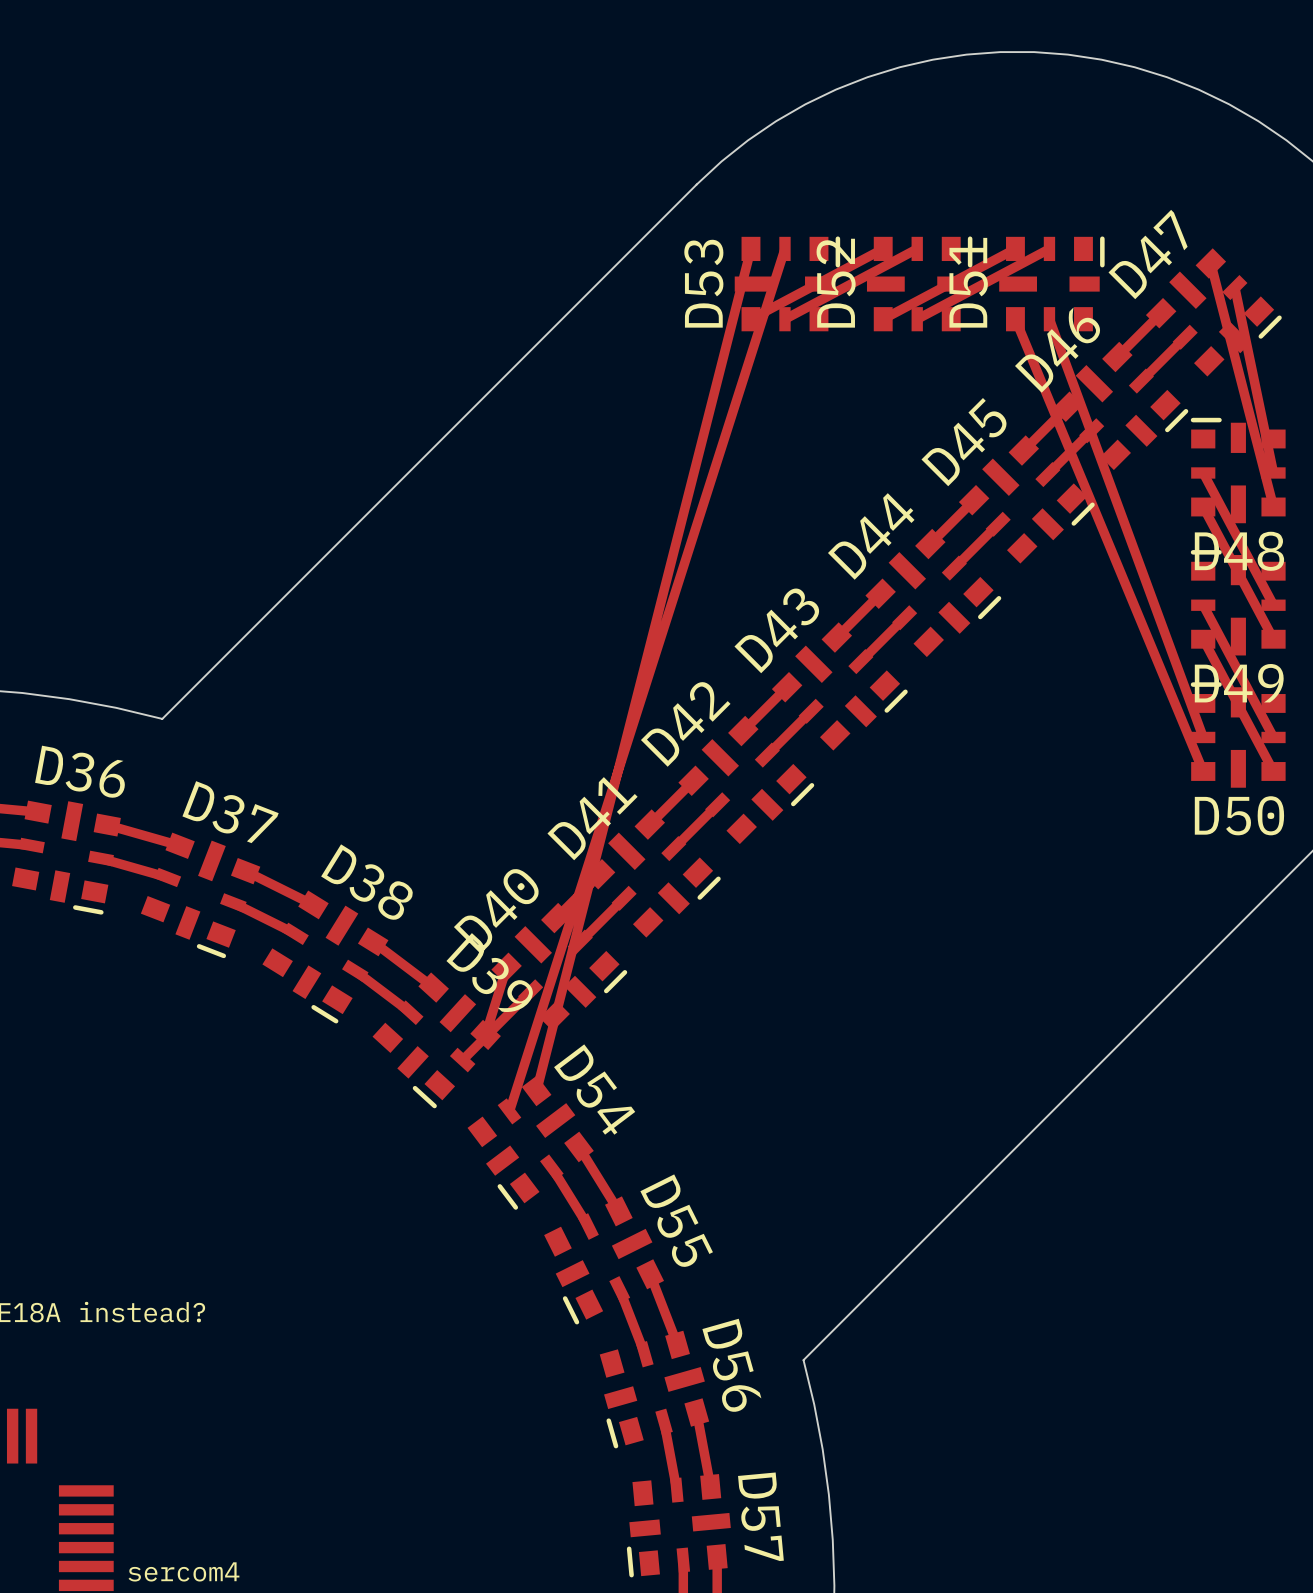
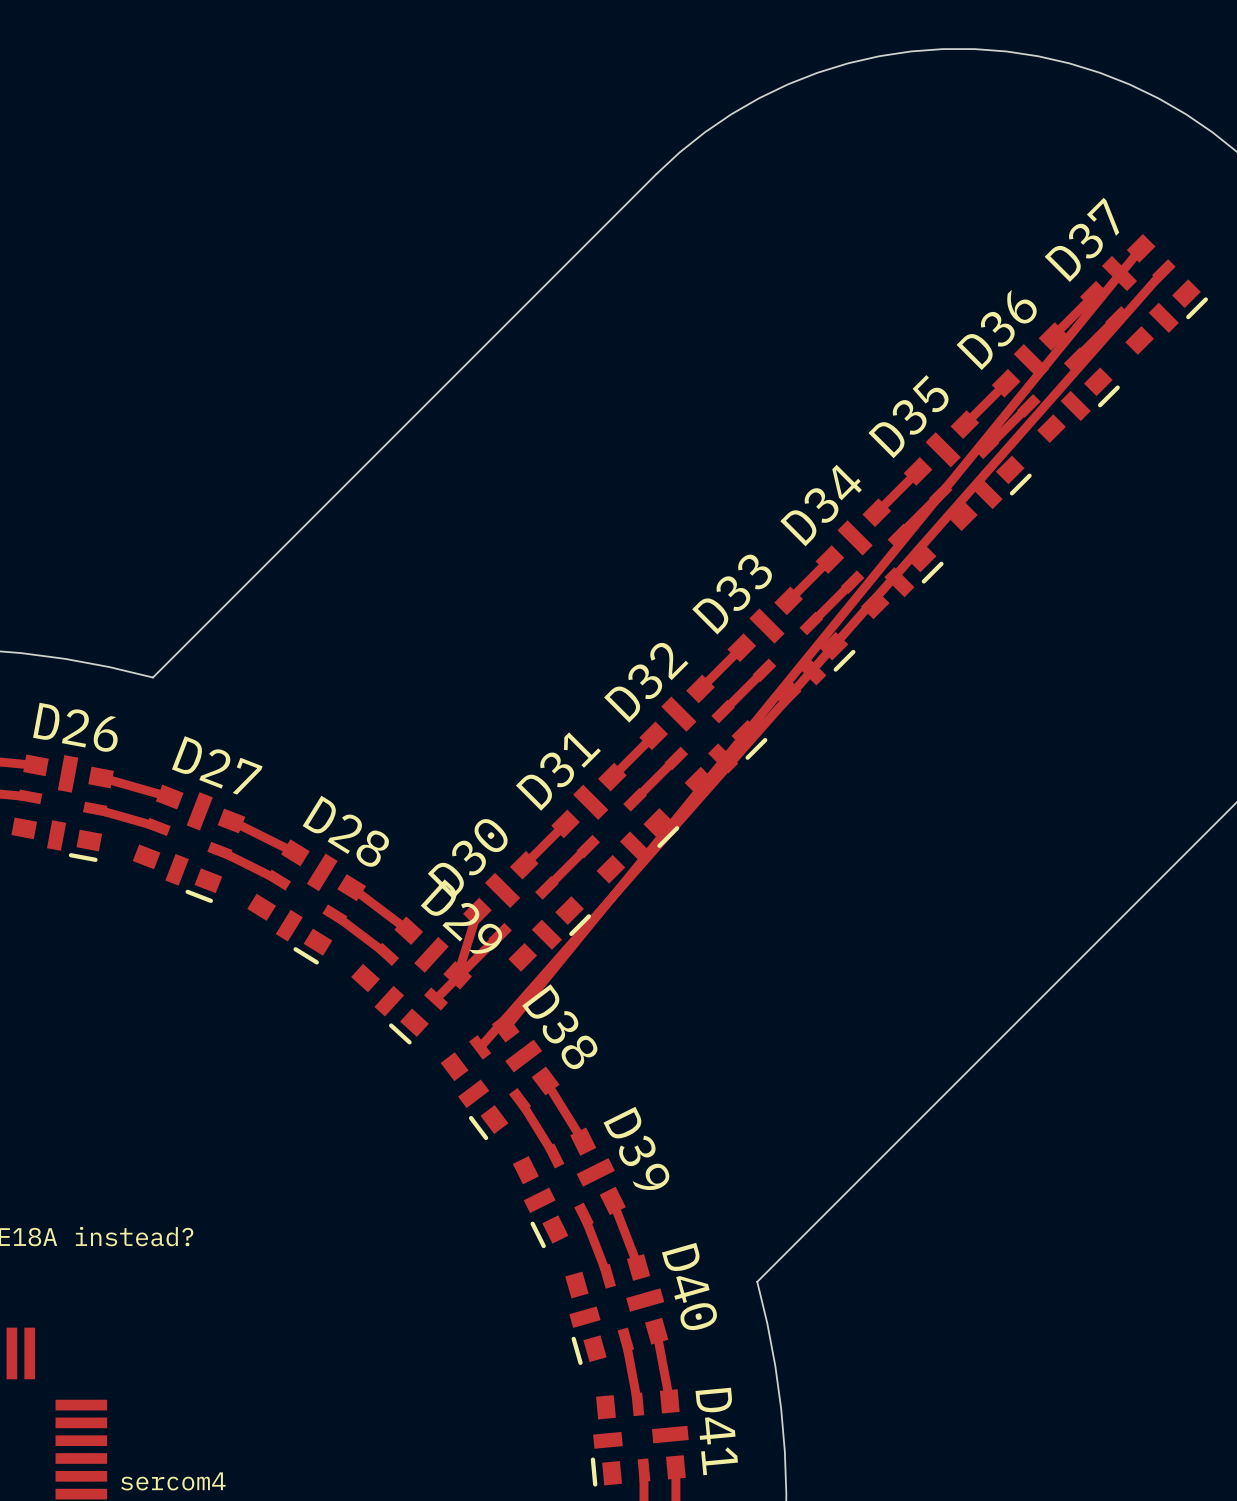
track: (750, 248) (536, 1090) -> (1141, 248) (505, 1028)
track: (784, 248) (509, 1111) -> (1163, 270) (480, 1047)
track: (883, 248) (750, 319) -> none
track: (917, 248) (784, 319) -> none
track: (1015, 248) (883, 319) -> none
track: (1049, 248) (917, 319) -> none
D47 name: D47 (1148, 254) -> D37 (1081, 239)
track: (1210, 263) (1273, 506) -> none
D53: (787, 283) -> none
D52: (919, 283) -> none
D51: (1051, 283) -> none
track: (1234, 287) (1273, 472) -> none
track: (1015, 319) (1203, 771) -> none
track: (1049, 319) (1203, 737) -> none
D46 name: D46 (1057, 350) -> D36 (996, 329)
D45 name: D45 (963, 442) -> D35 (908, 416)
D48: (1238, 470) -> none
track: (1203, 472) (1273, 605) -> none
track: (1203, 506) (1273, 639) -> none
D44 name: D44 (871, 536) -> D34 (821, 505)
D49: (1238, 602) -> none
track: (1203, 605) (1273, 737) -> none
D43 name: D43 (776, 630) -> D33 (732, 594)
track: (1203, 639) (1273, 771) -> none
D42 name: D42 (685, 724) -> D32 (646, 682)
D50: (1238, 735) -> none
D36 name: D36 (80, 771) -> D26 (75, 727)
D37 name: D37 (230, 812) -> D27 (217, 765)
D41 name: D41 (592, 818) -> D31 (558, 771)
D38 name: D38 (367, 882) -> D28 (346, 831)
D40 name: D40 (496, 911) -> D30 (467, 858)
D39 name: D39 (489, 972) -> D29 (461, 916)
D54 name: D54 (594, 1089) -> D38 (559, 1026)
D55 name: D55 (676, 1220) -> D39 (636, 1148)
D56 name: D56 (731, 1365) -> D40 (689, 1286)
D57 name: D57 (760, 1516) -> D41 (716, 1431)

